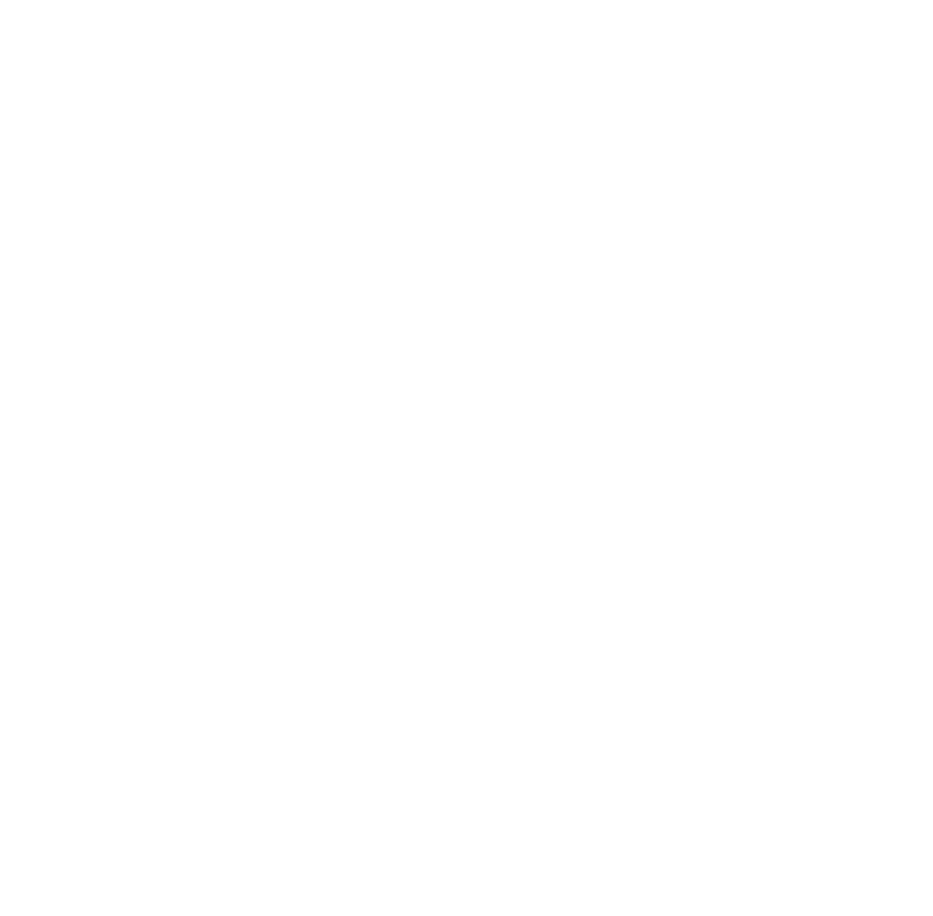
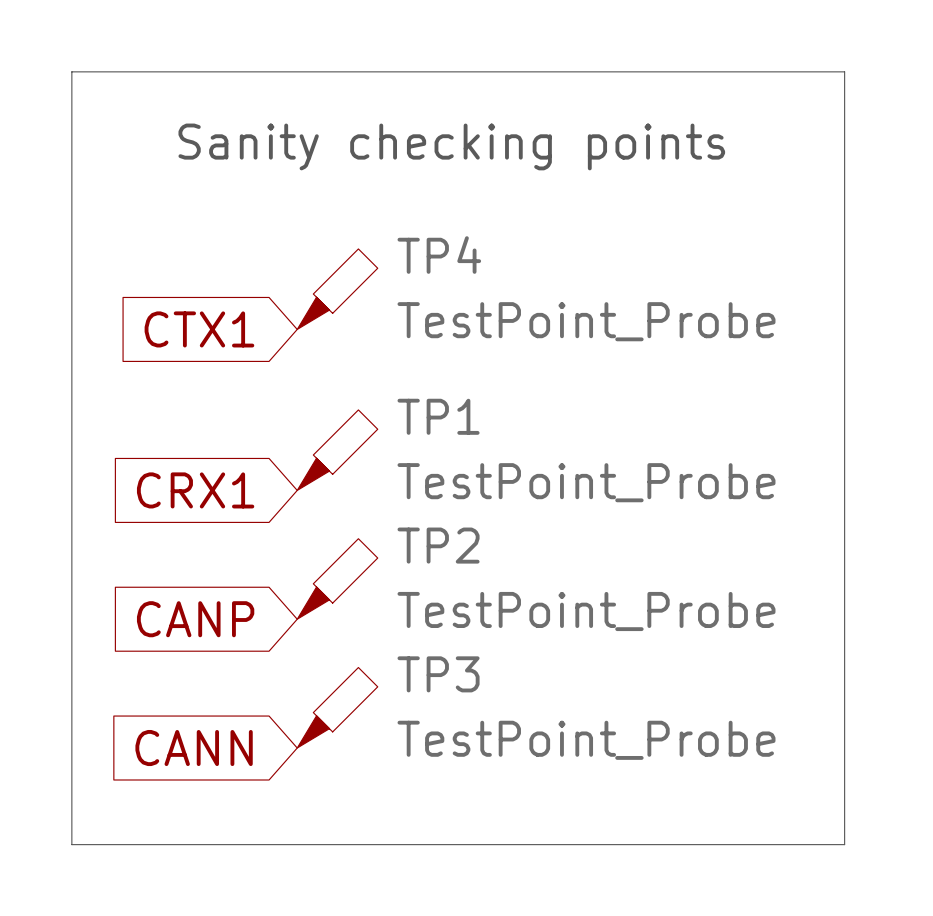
line: none -> (71, 71) (844, 71) (844, 844) (71, 844) (71, 71)
text: none -> Sanity checking points (451, 146)
TP4: none -> TestPoint_Probe (337, 289)
global label: none -> CTX1 (199, 329)
TP1: none -> TestPoint_Probe (337, 450)
global label: none -> CRX1 (195, 490)
TP2: none -> TestPoint_Probe (337, 578)
global label: none -> CANP (195, 619)
TP3: none -> TestPoint_Probe (337, 707)
global label: none -> CANN (194, 748)

